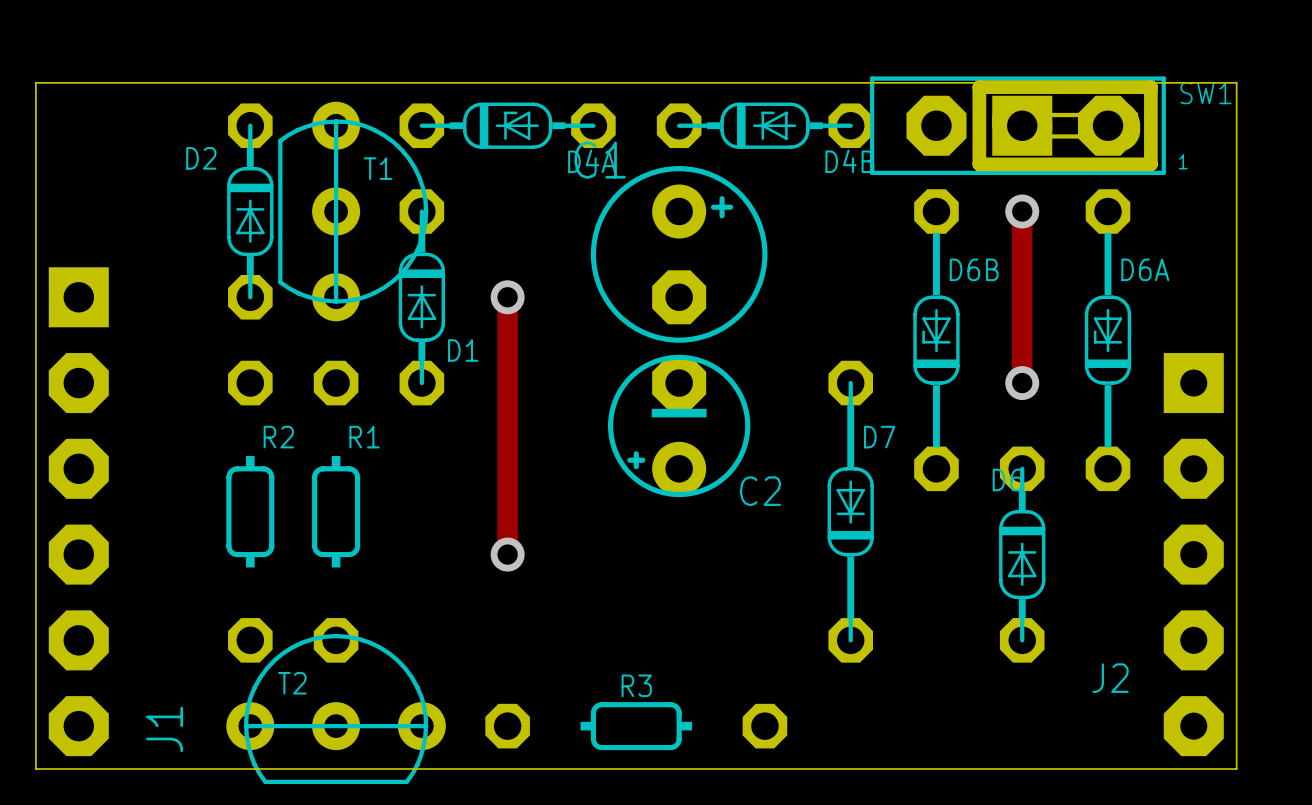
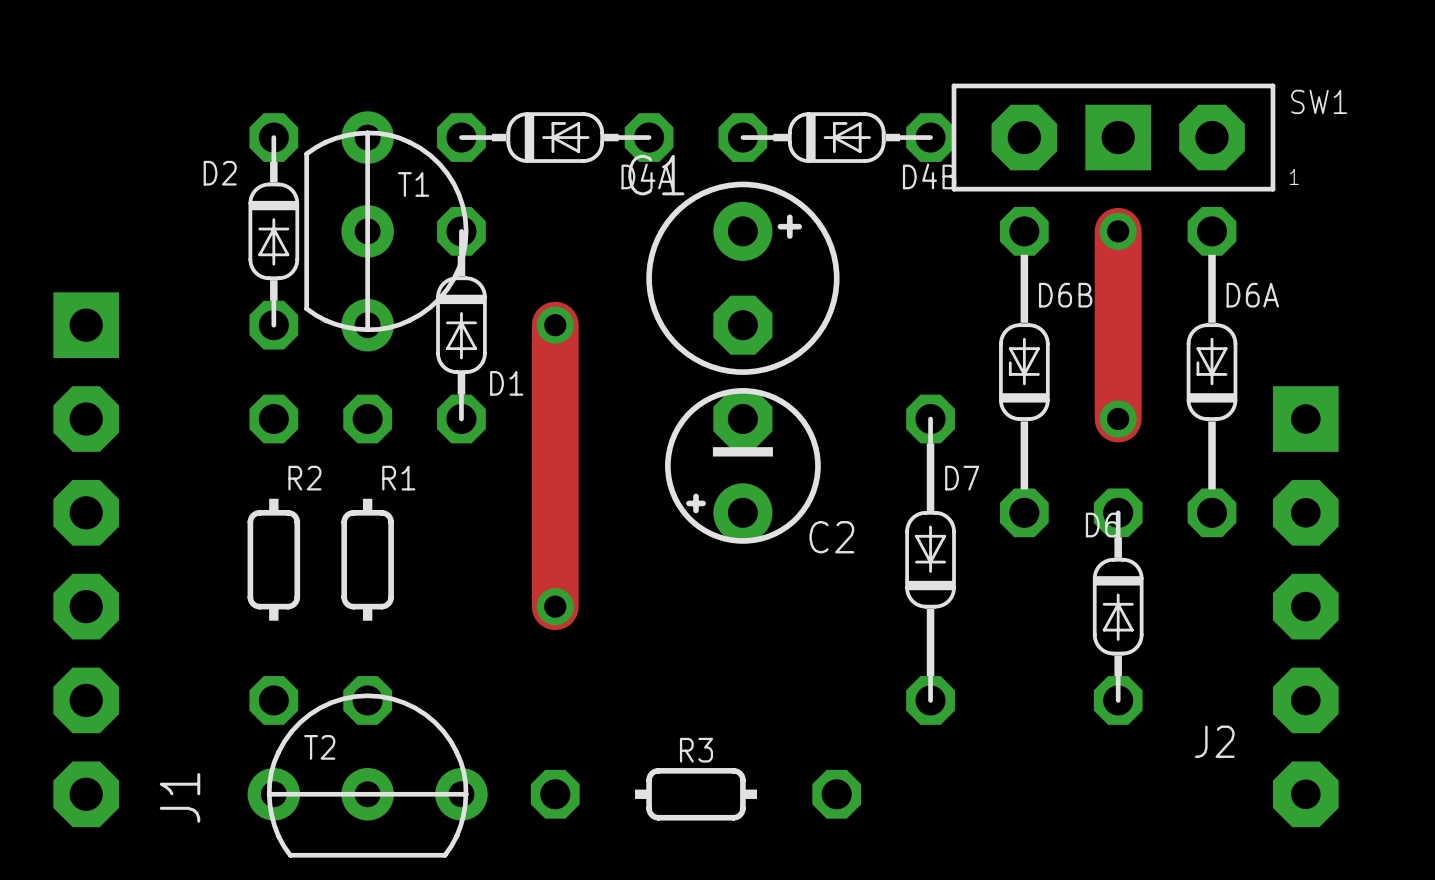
SW1 footprint: [870, 76, 1166, 176] -> [951, 83, 1276, 192]
board edge: (35, 82) (1236, 82) (1236, 769) (35, 769) (35, 82) -> none
track width: thin (1022, 211) (1022, 383) -> thick (1118, 231) (1118, 419)
track width: thin (507, 297) (507, 554) -> thick (555, 325) (555, 606)

